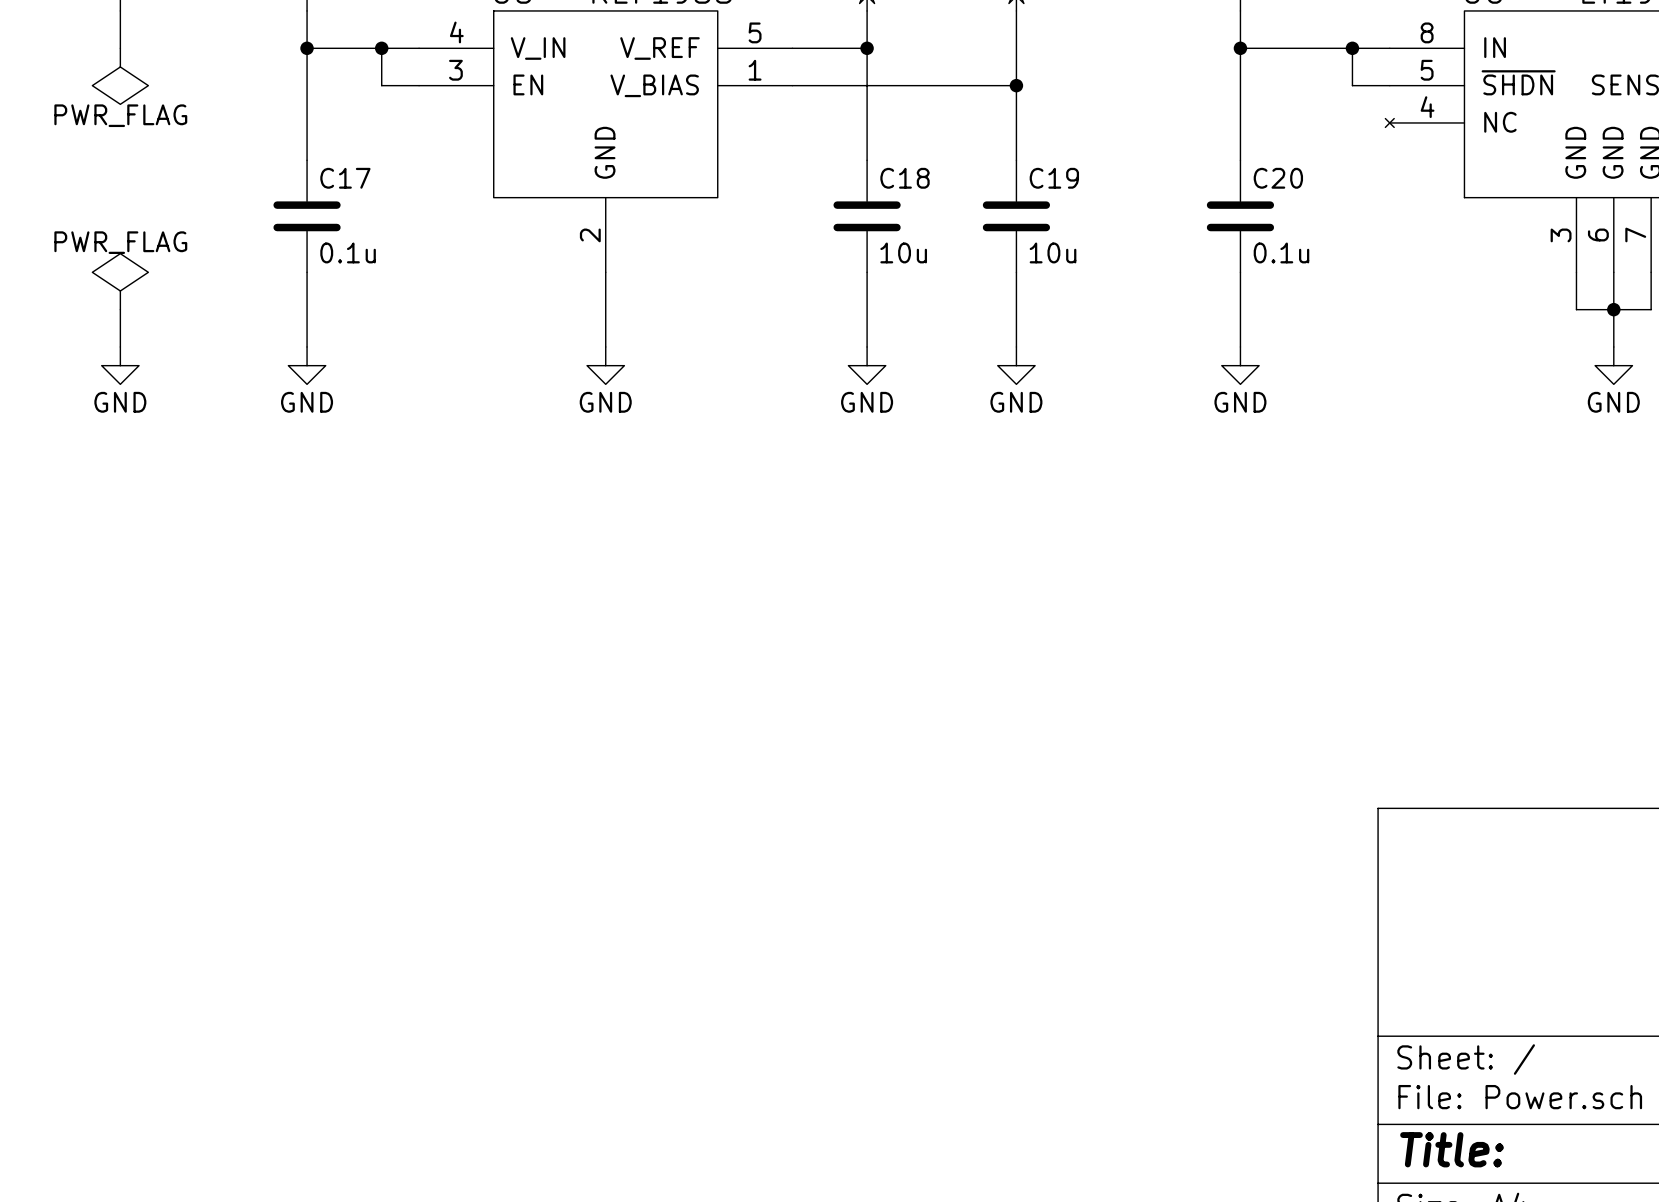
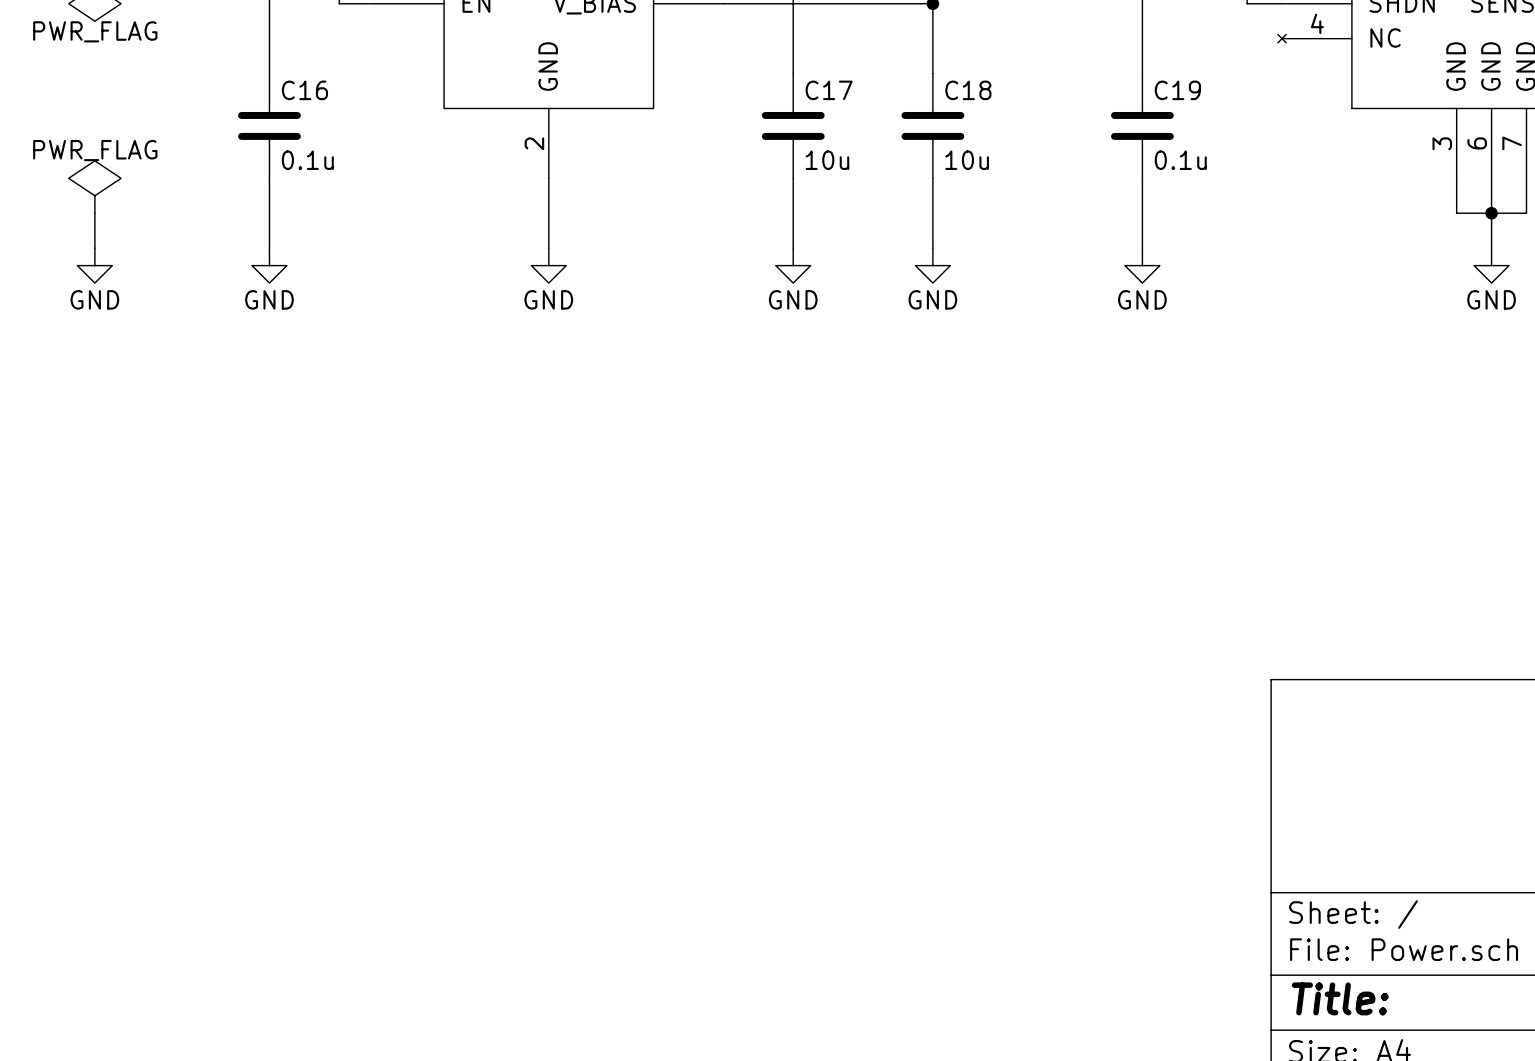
C17 name: C17 (345, 178) -> C16 (304, 90)
C18 name: C18 (905, 178) -> C17 (829, 90)
C19 name: C19 (1054, 178) -> C18 (968, 90)
C20 name: C20 (1278, 178) -> C19 (1177, 90)

